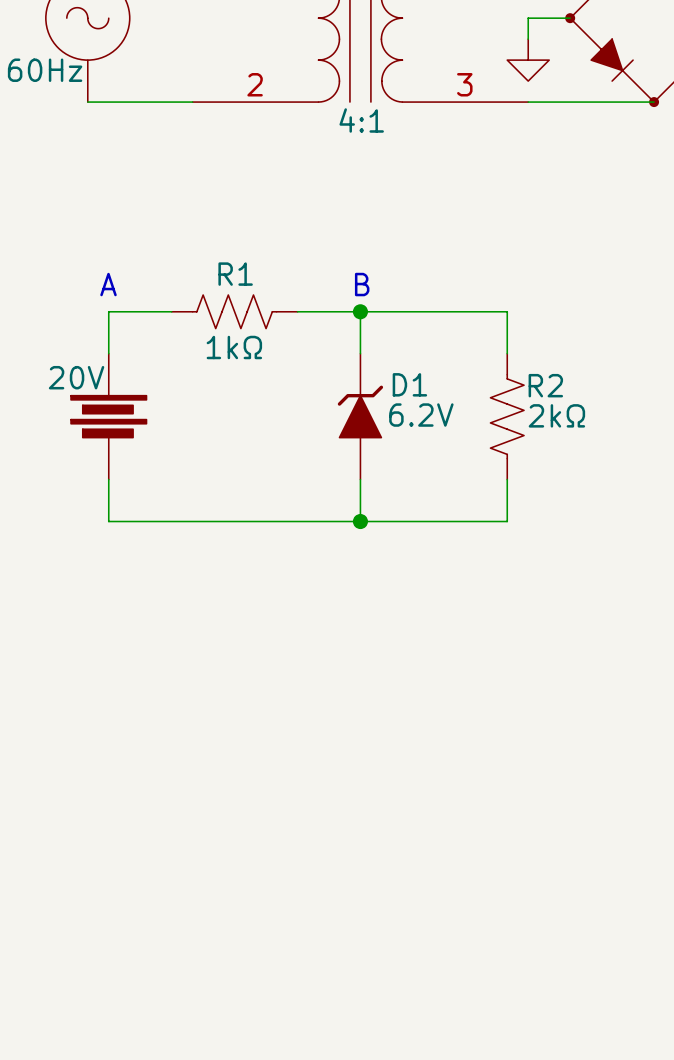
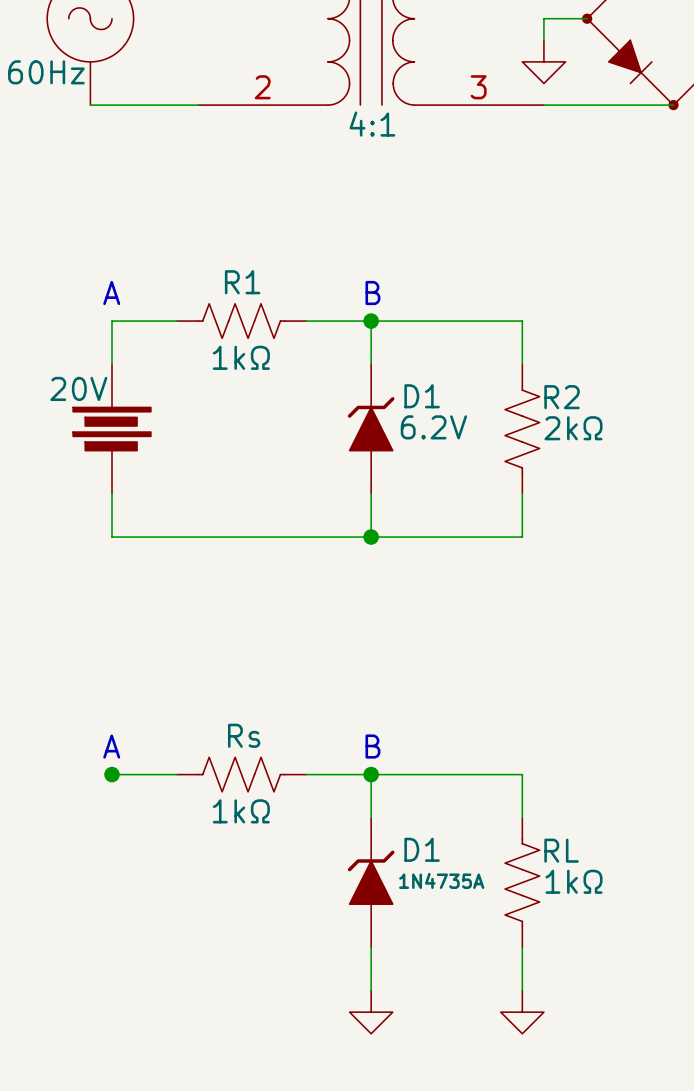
text: none -> A (111, 746)
text: none -> B (372, 746)
wire: none -> (112, 774) (176, 774)
junction: none -> (112, 774)
Rs: none -> 1kΩ (241, 774)
wire: none -> (306, 774) (522, 774) (522, 817)
wire: none -> (371, 774) (371, 817)
junction: none -> (371, 774)
D1: none -> 1N4735A (371, 882)
RL: none -> 1kΩ (522, 882)
wire: none -> (371, 947) (371, 990)
wire: none -> (522, 947) (522, 990)
power symbol: none -> (371, 1012)
power symbol: none -> (522, 1012)

